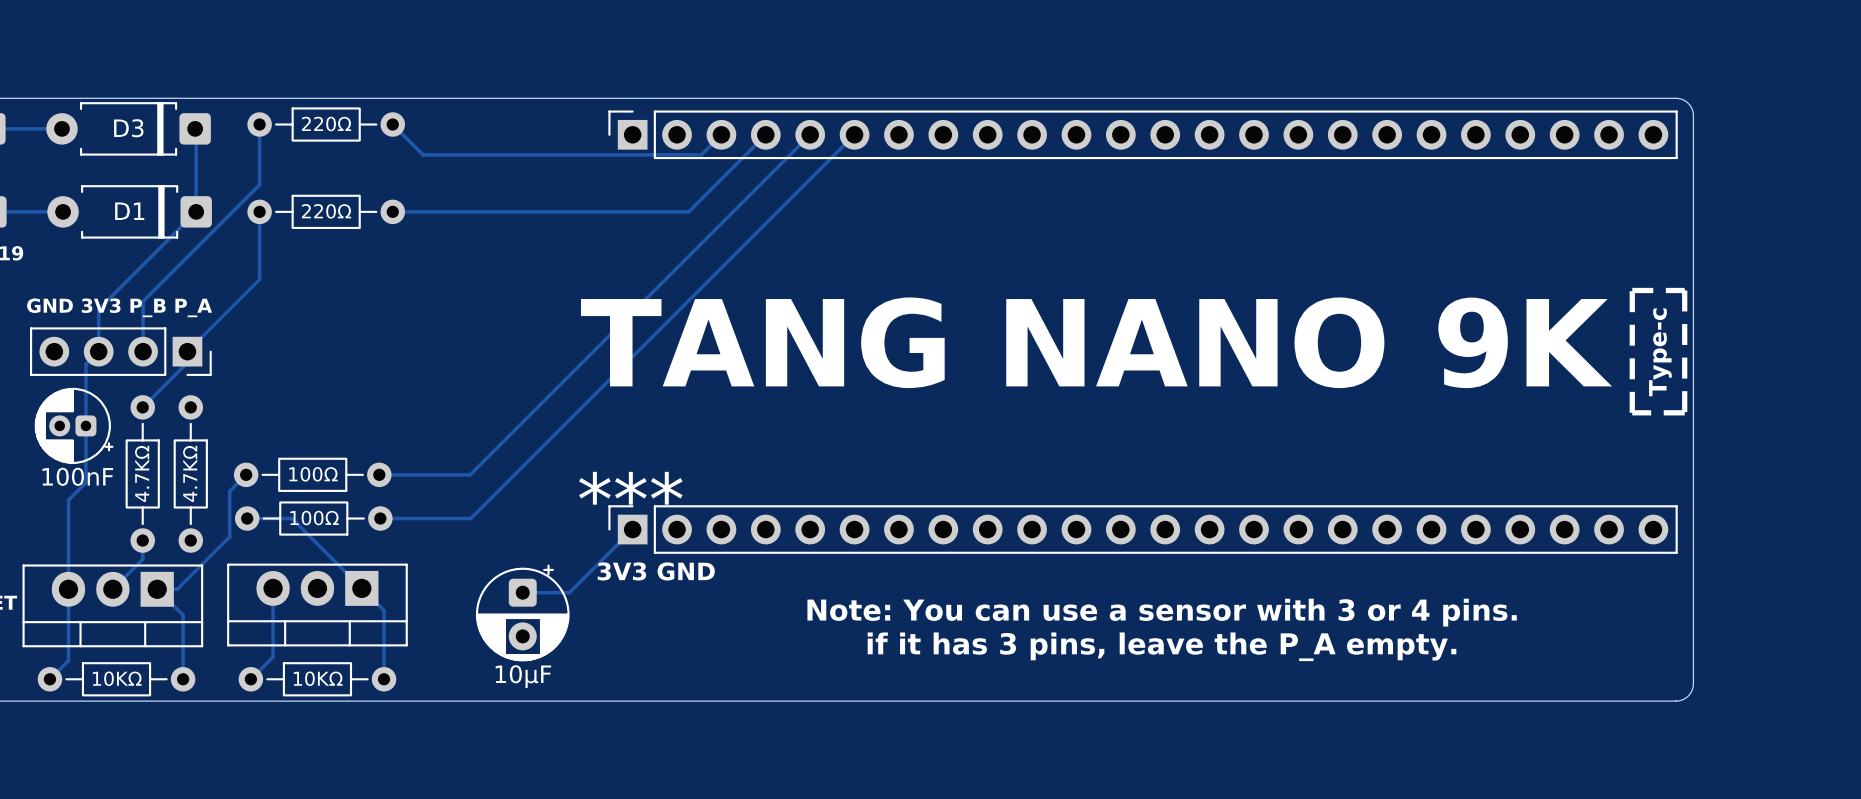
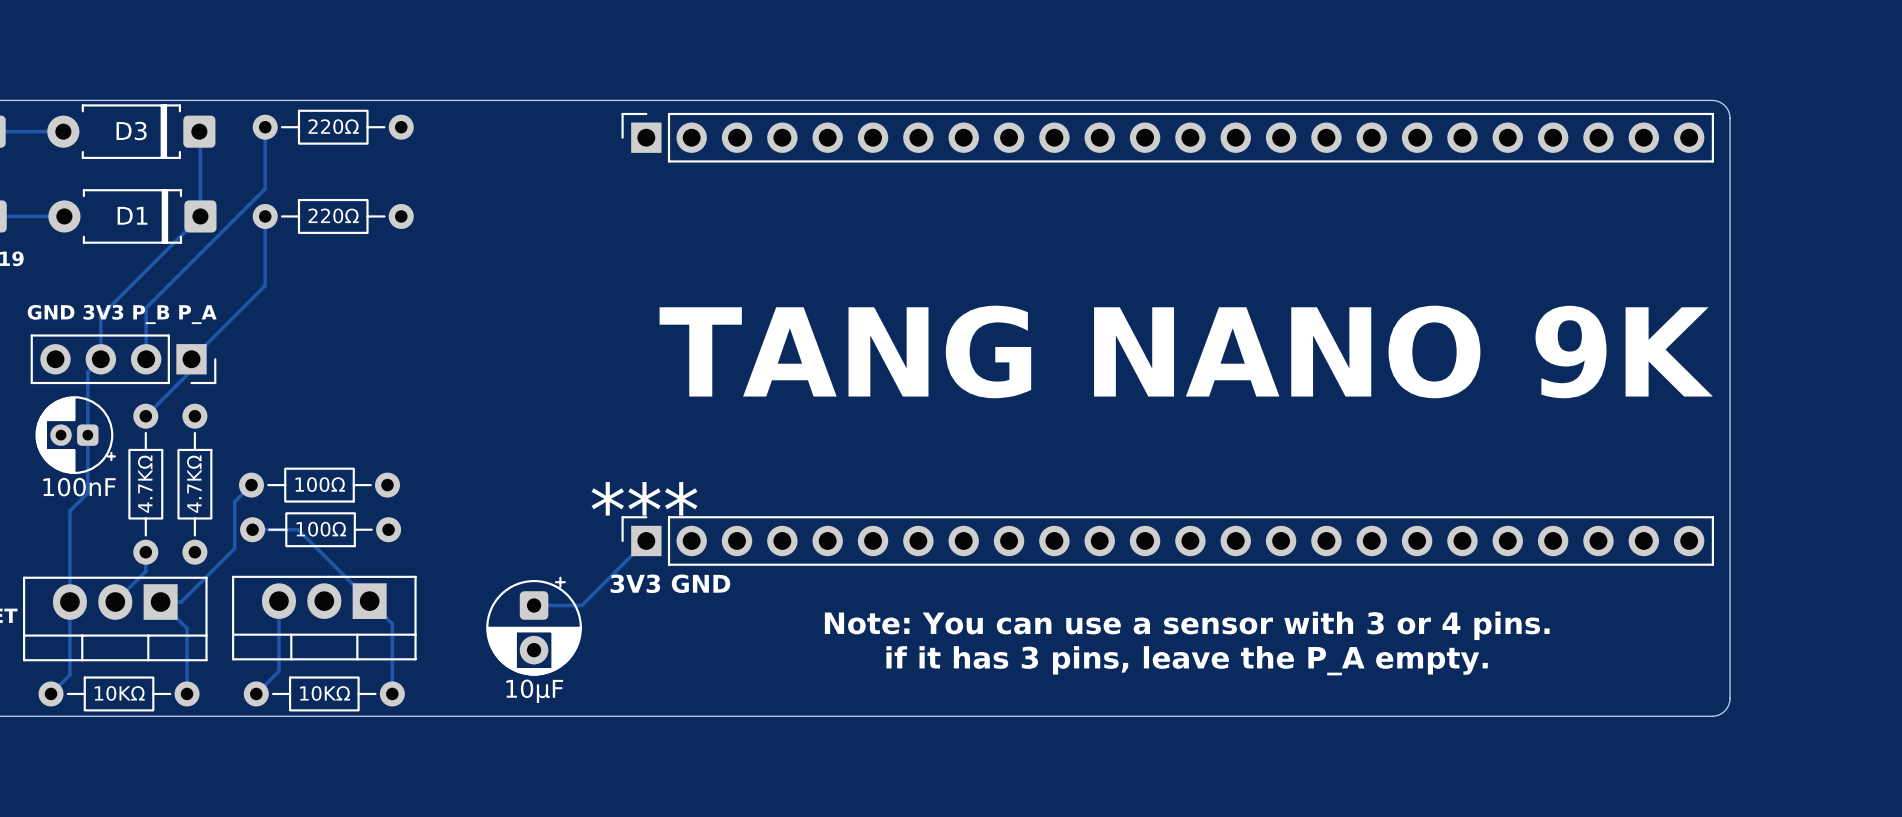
track: (392, 124) (423, 154) (701, 154) (721, 134) -> none
track: (765, 134) (688, 211) (392, 211) -> none
track: (810, 134) (470, 474) (379, 474) -> none
track: (854, 134) (470, 518) (380, 518) -> none
line: (1632, 290) (1684, 290) (1684, 412) (1632, 412) (1632, 290) -> none
text position: TANG NANO 9K (1096, 342) -> TANG NANO 9K (1186, 351)
text: Type-c (1660, 352) -> none

